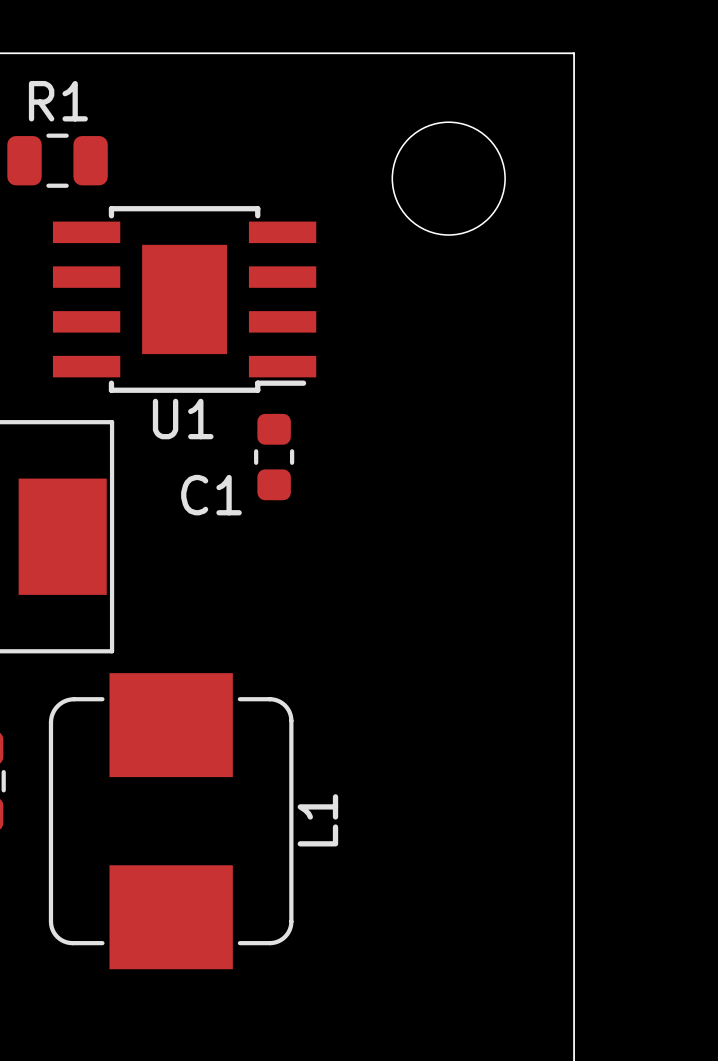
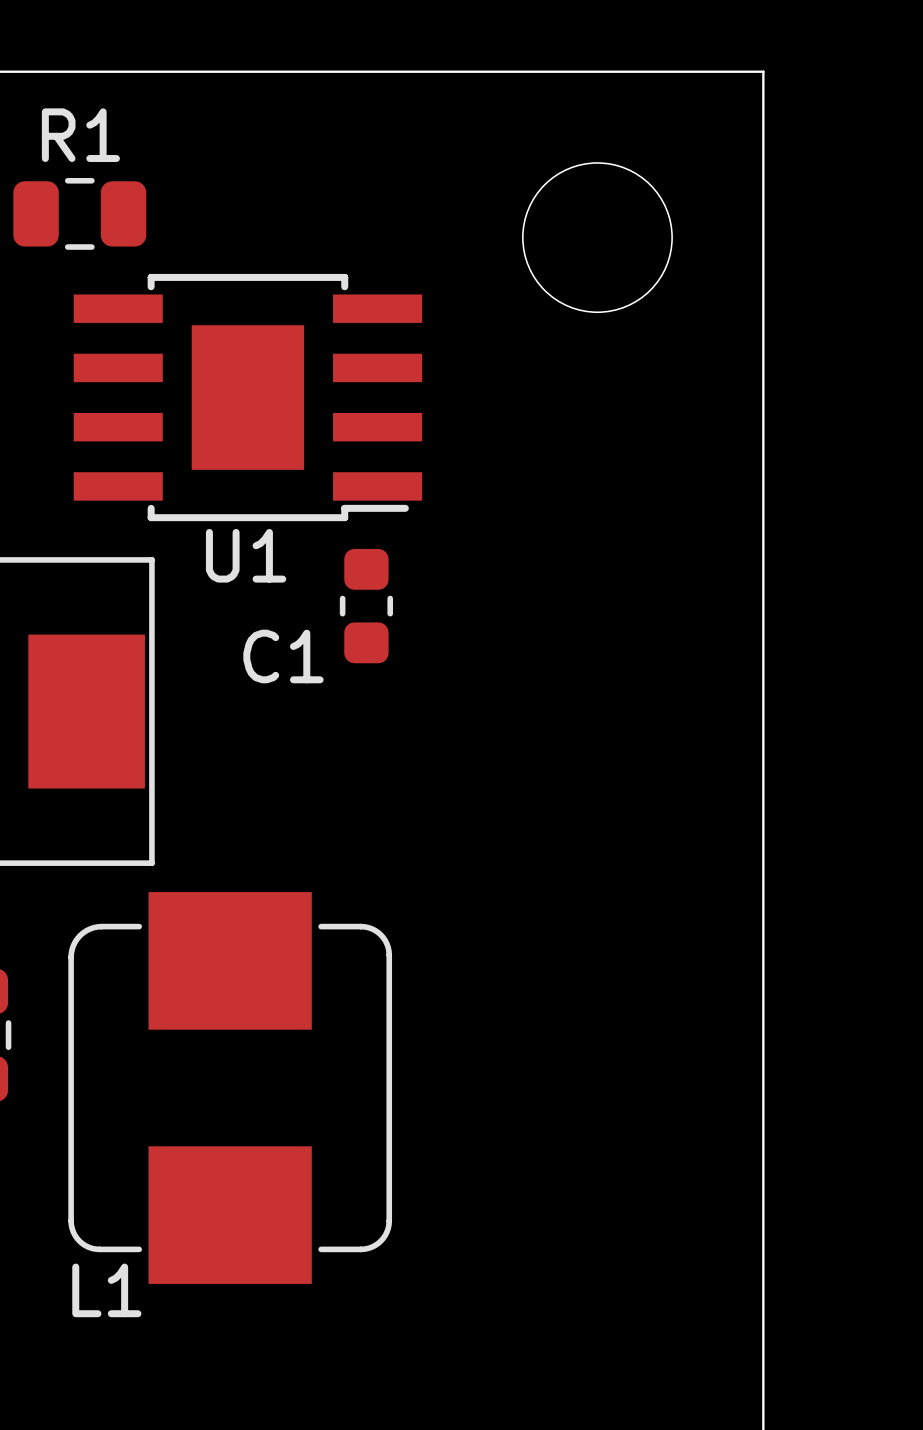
L1 name rotation: 0° (317, 820) -> 90° clockwise (106, 1290)
L1 name position: L1 (317, 820) -> L1 (106, 1290)

